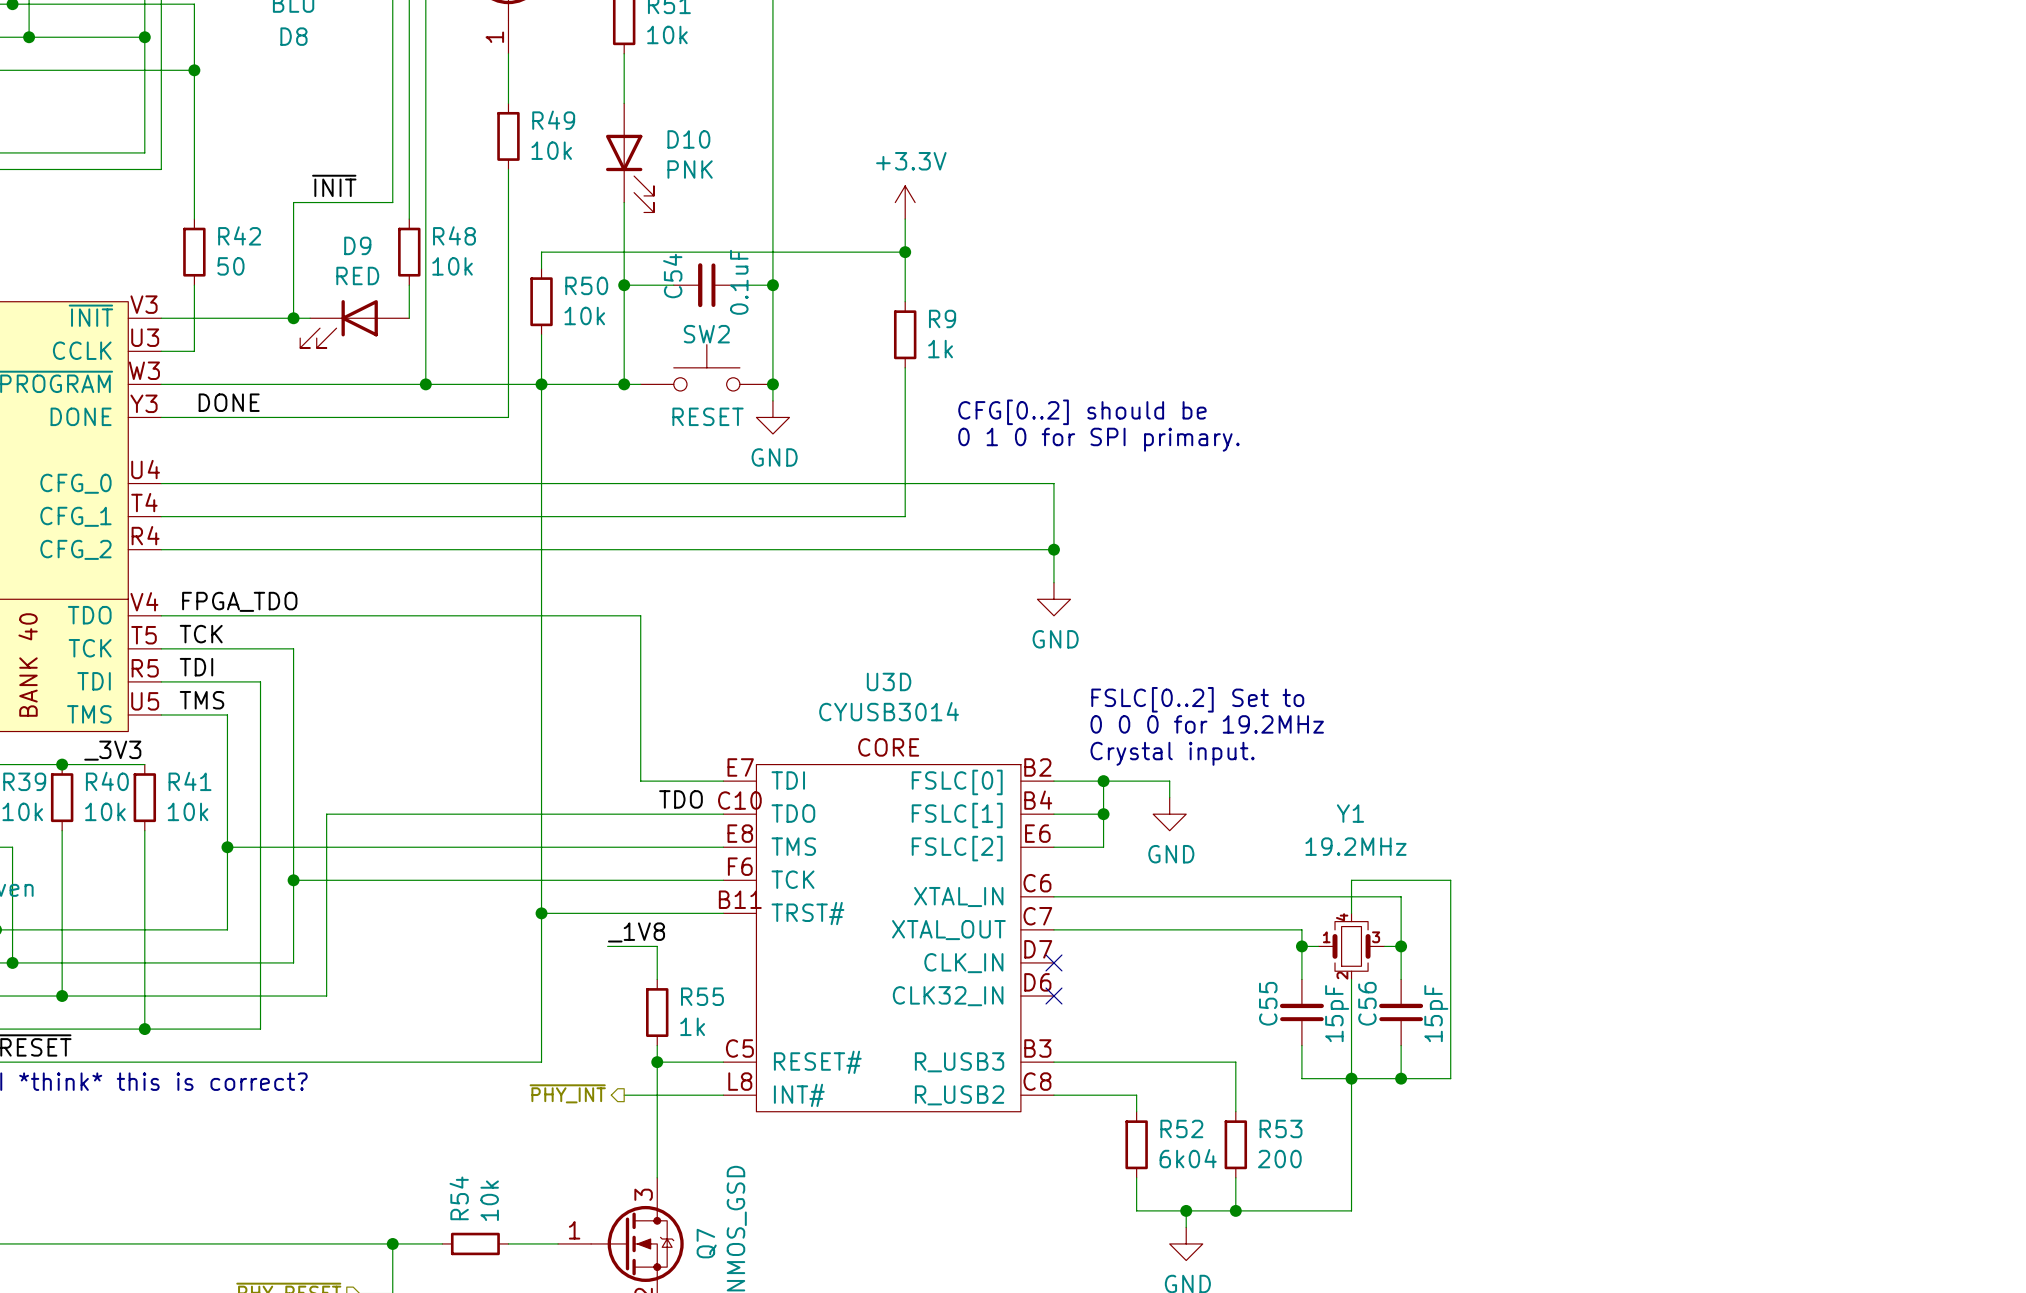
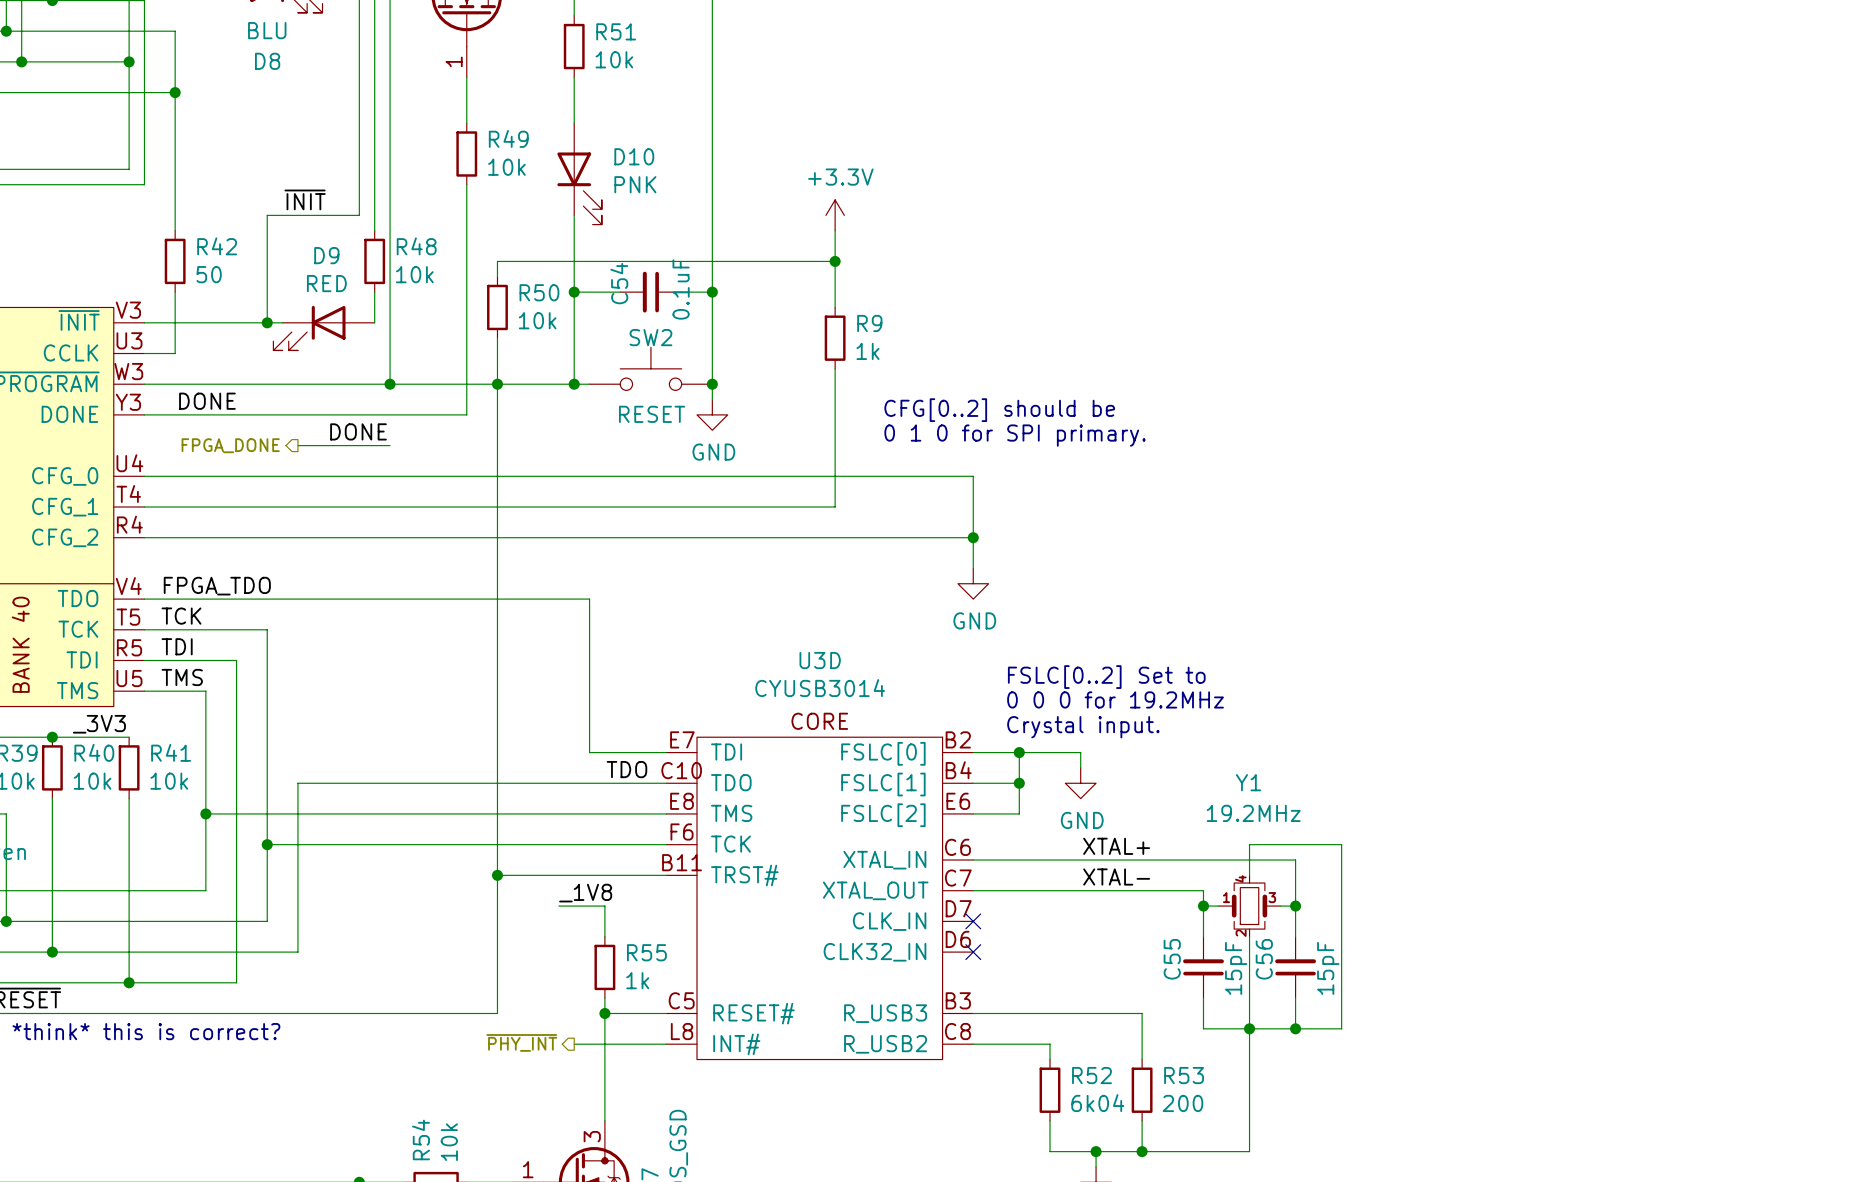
label: none -> DONE (358, 431)
hierarchical label: none -> FPGA_DONE (230, 445)
wire: none -> (297, 445) (390, 445)
label: none -> XTAL+ (1116, 846)
label: none -> XTAL- (1116, 877)

